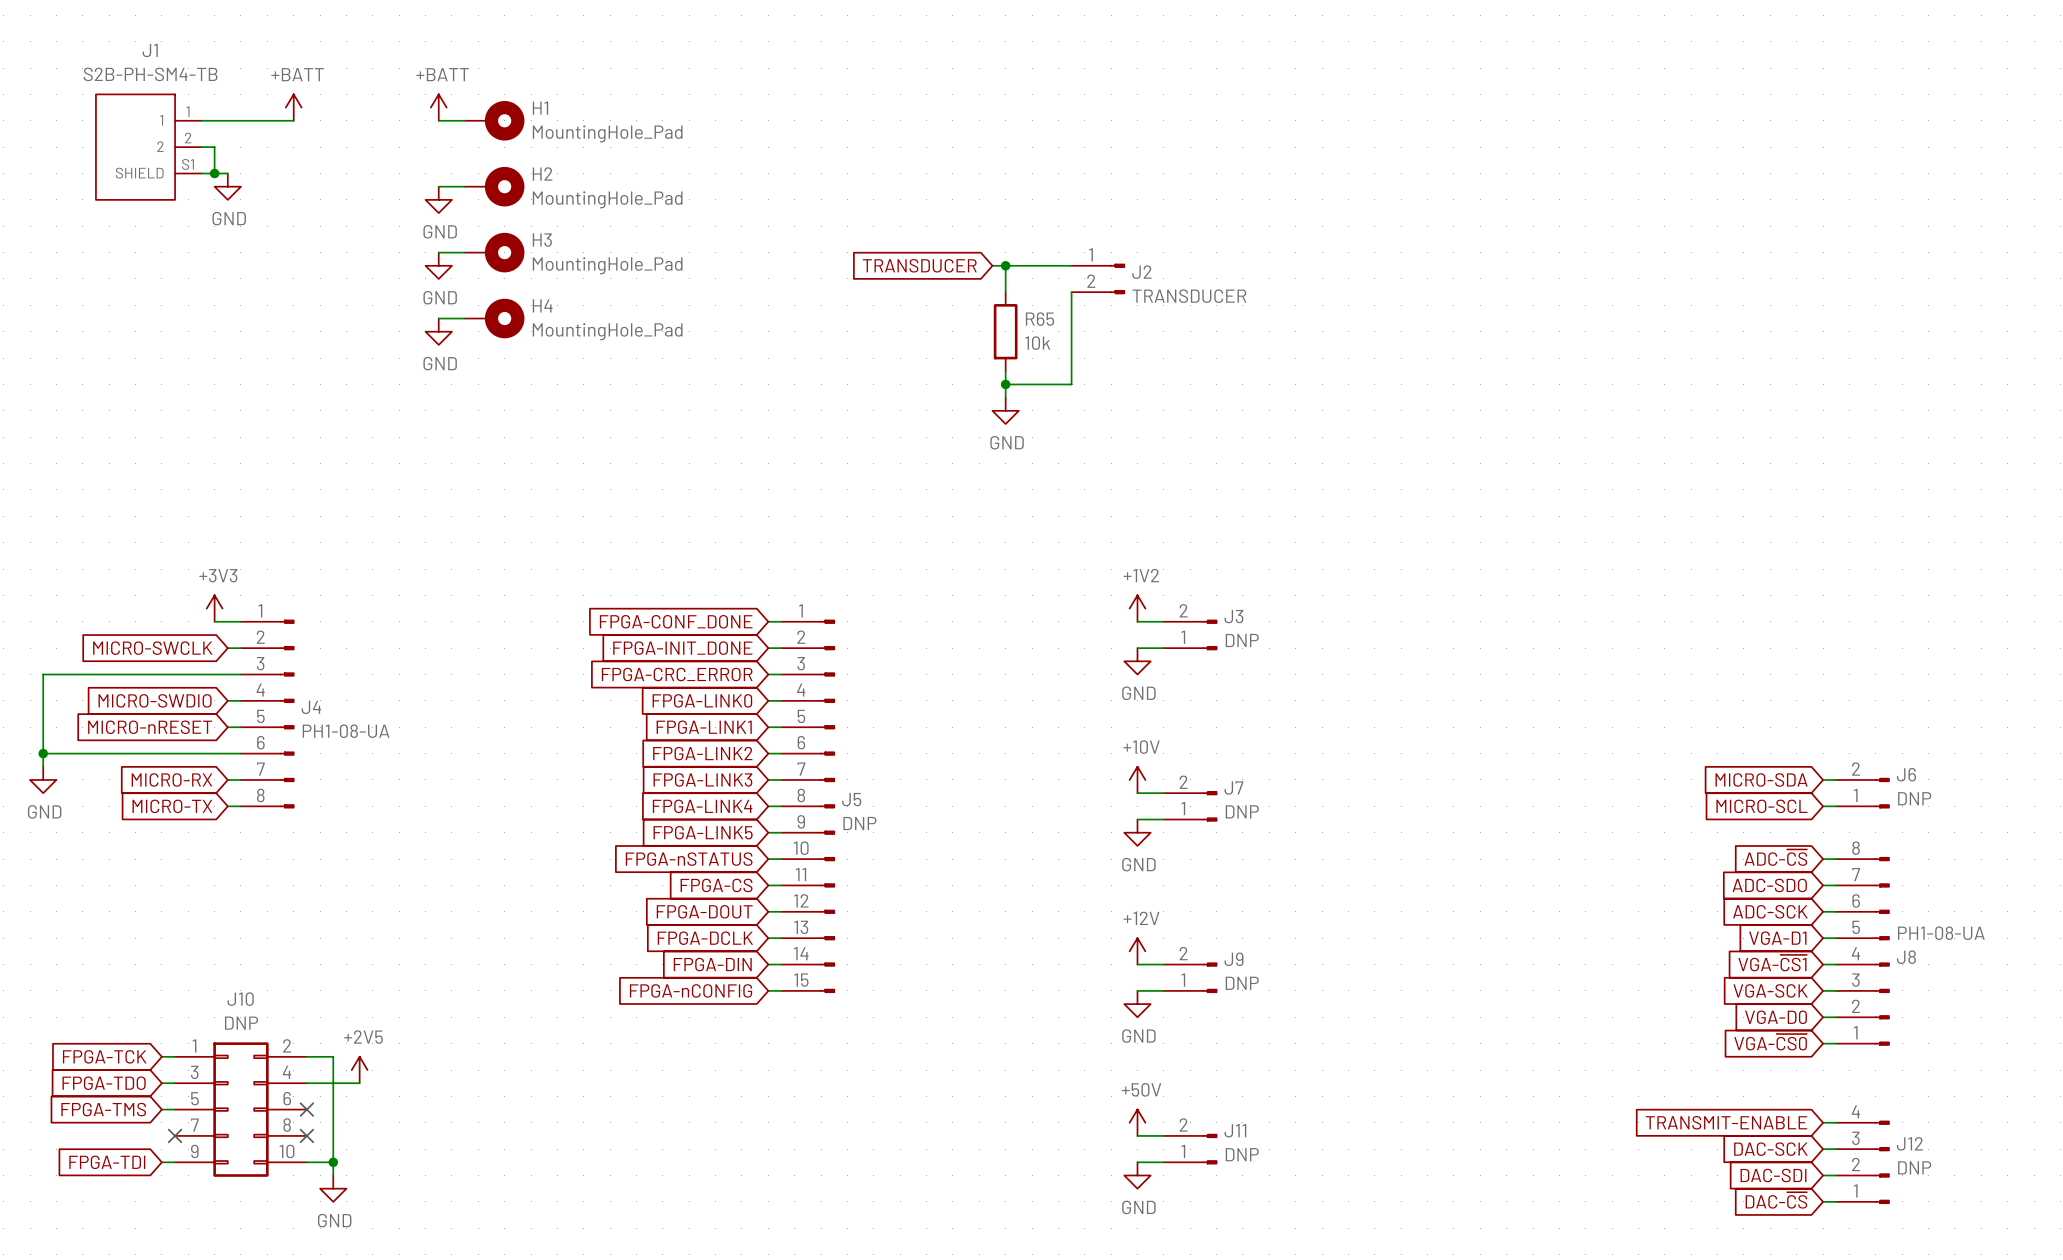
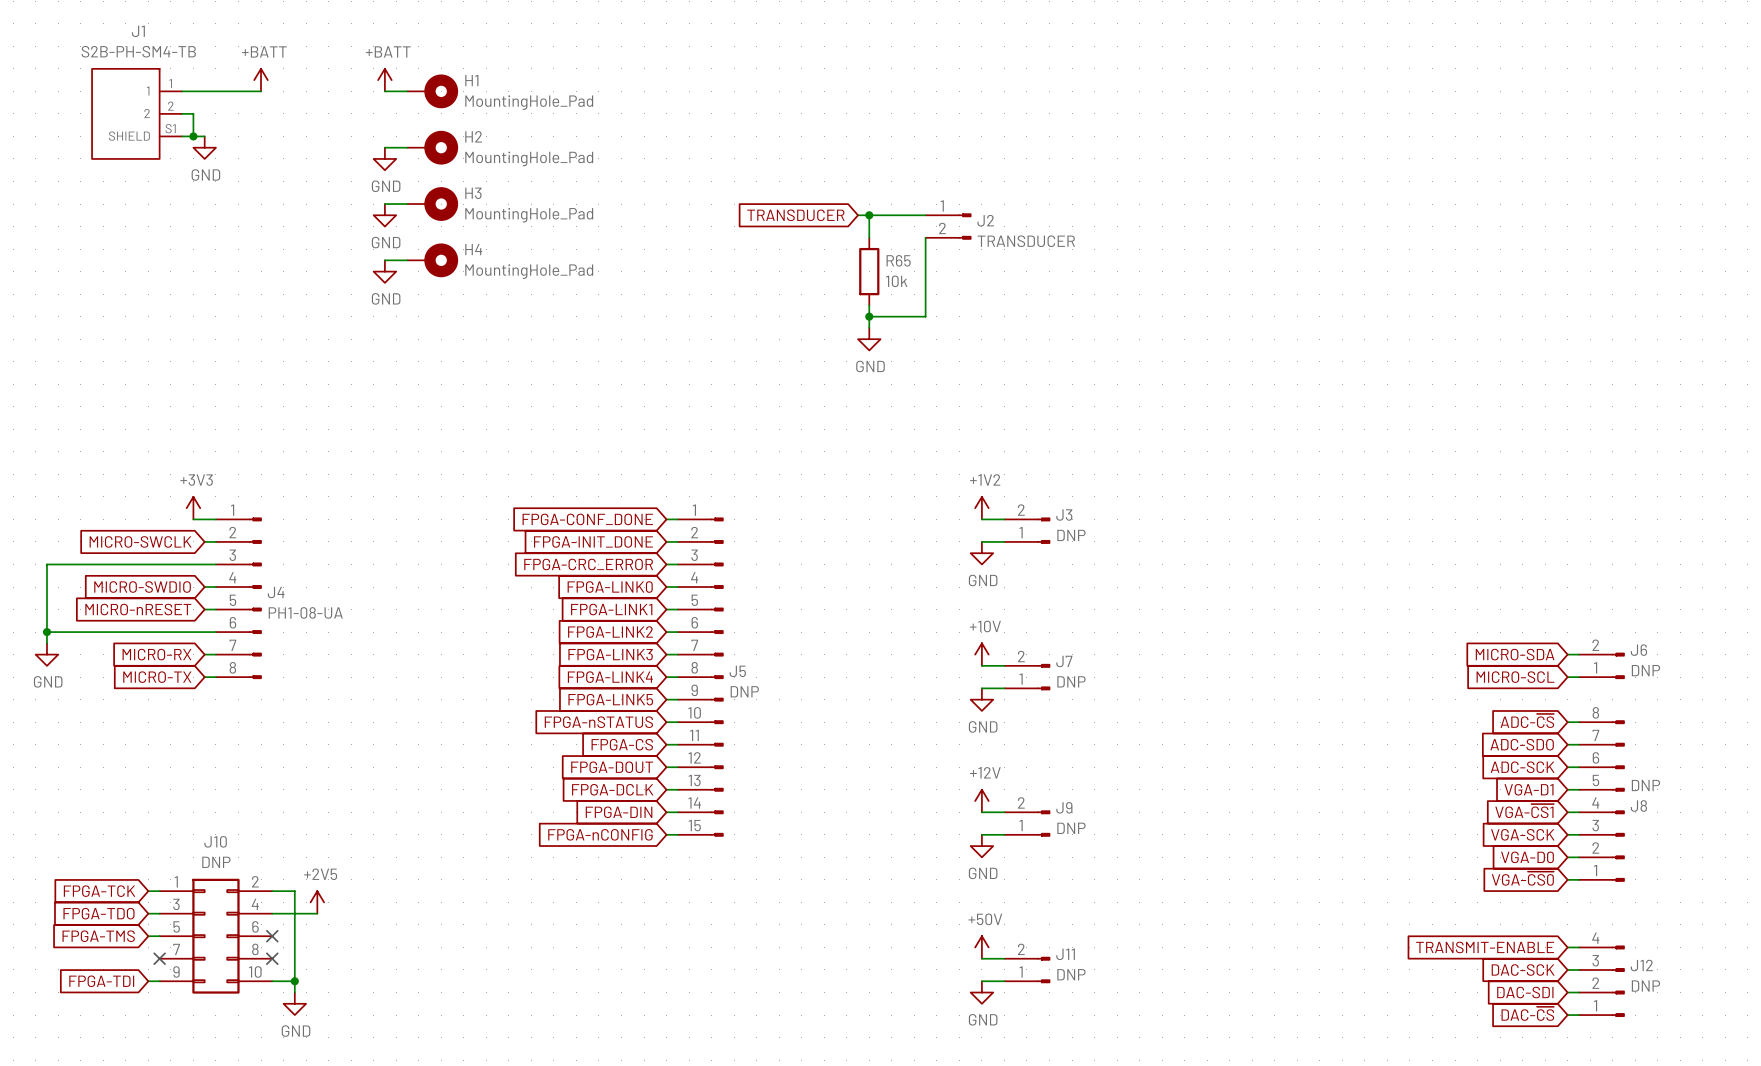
J8 value: PH1-08-UA (1941, 933) -> DNP (1645, 785)

